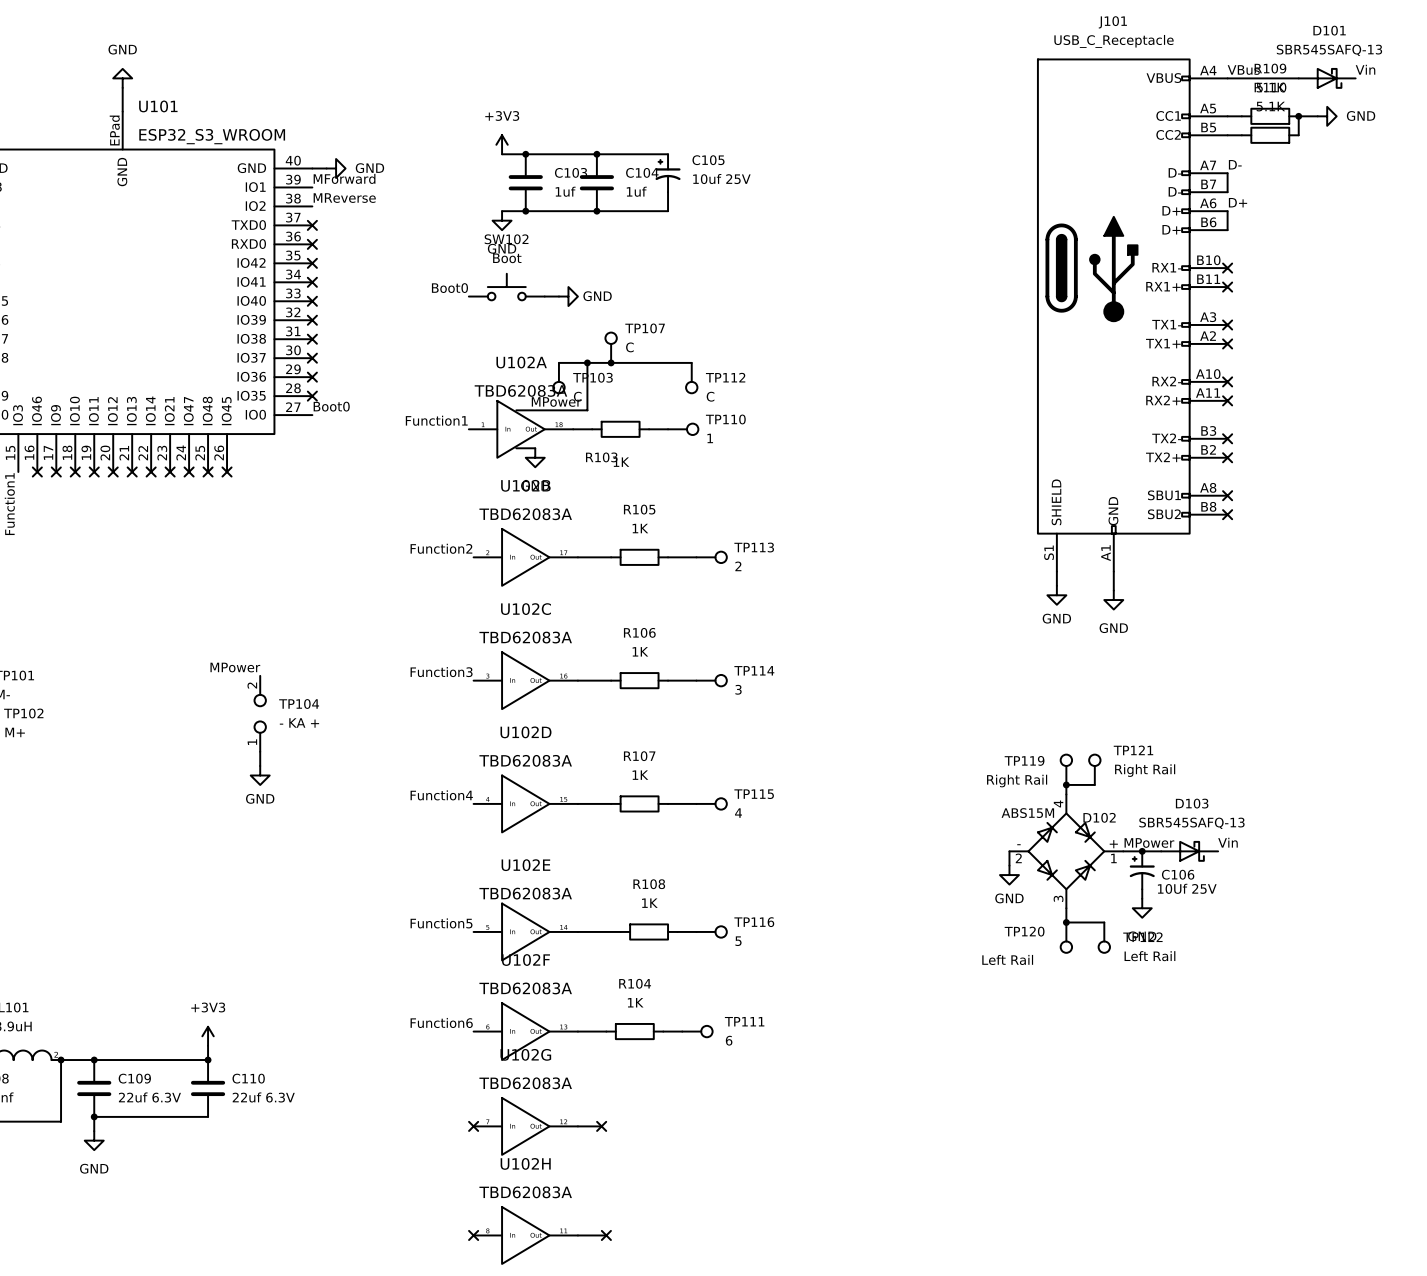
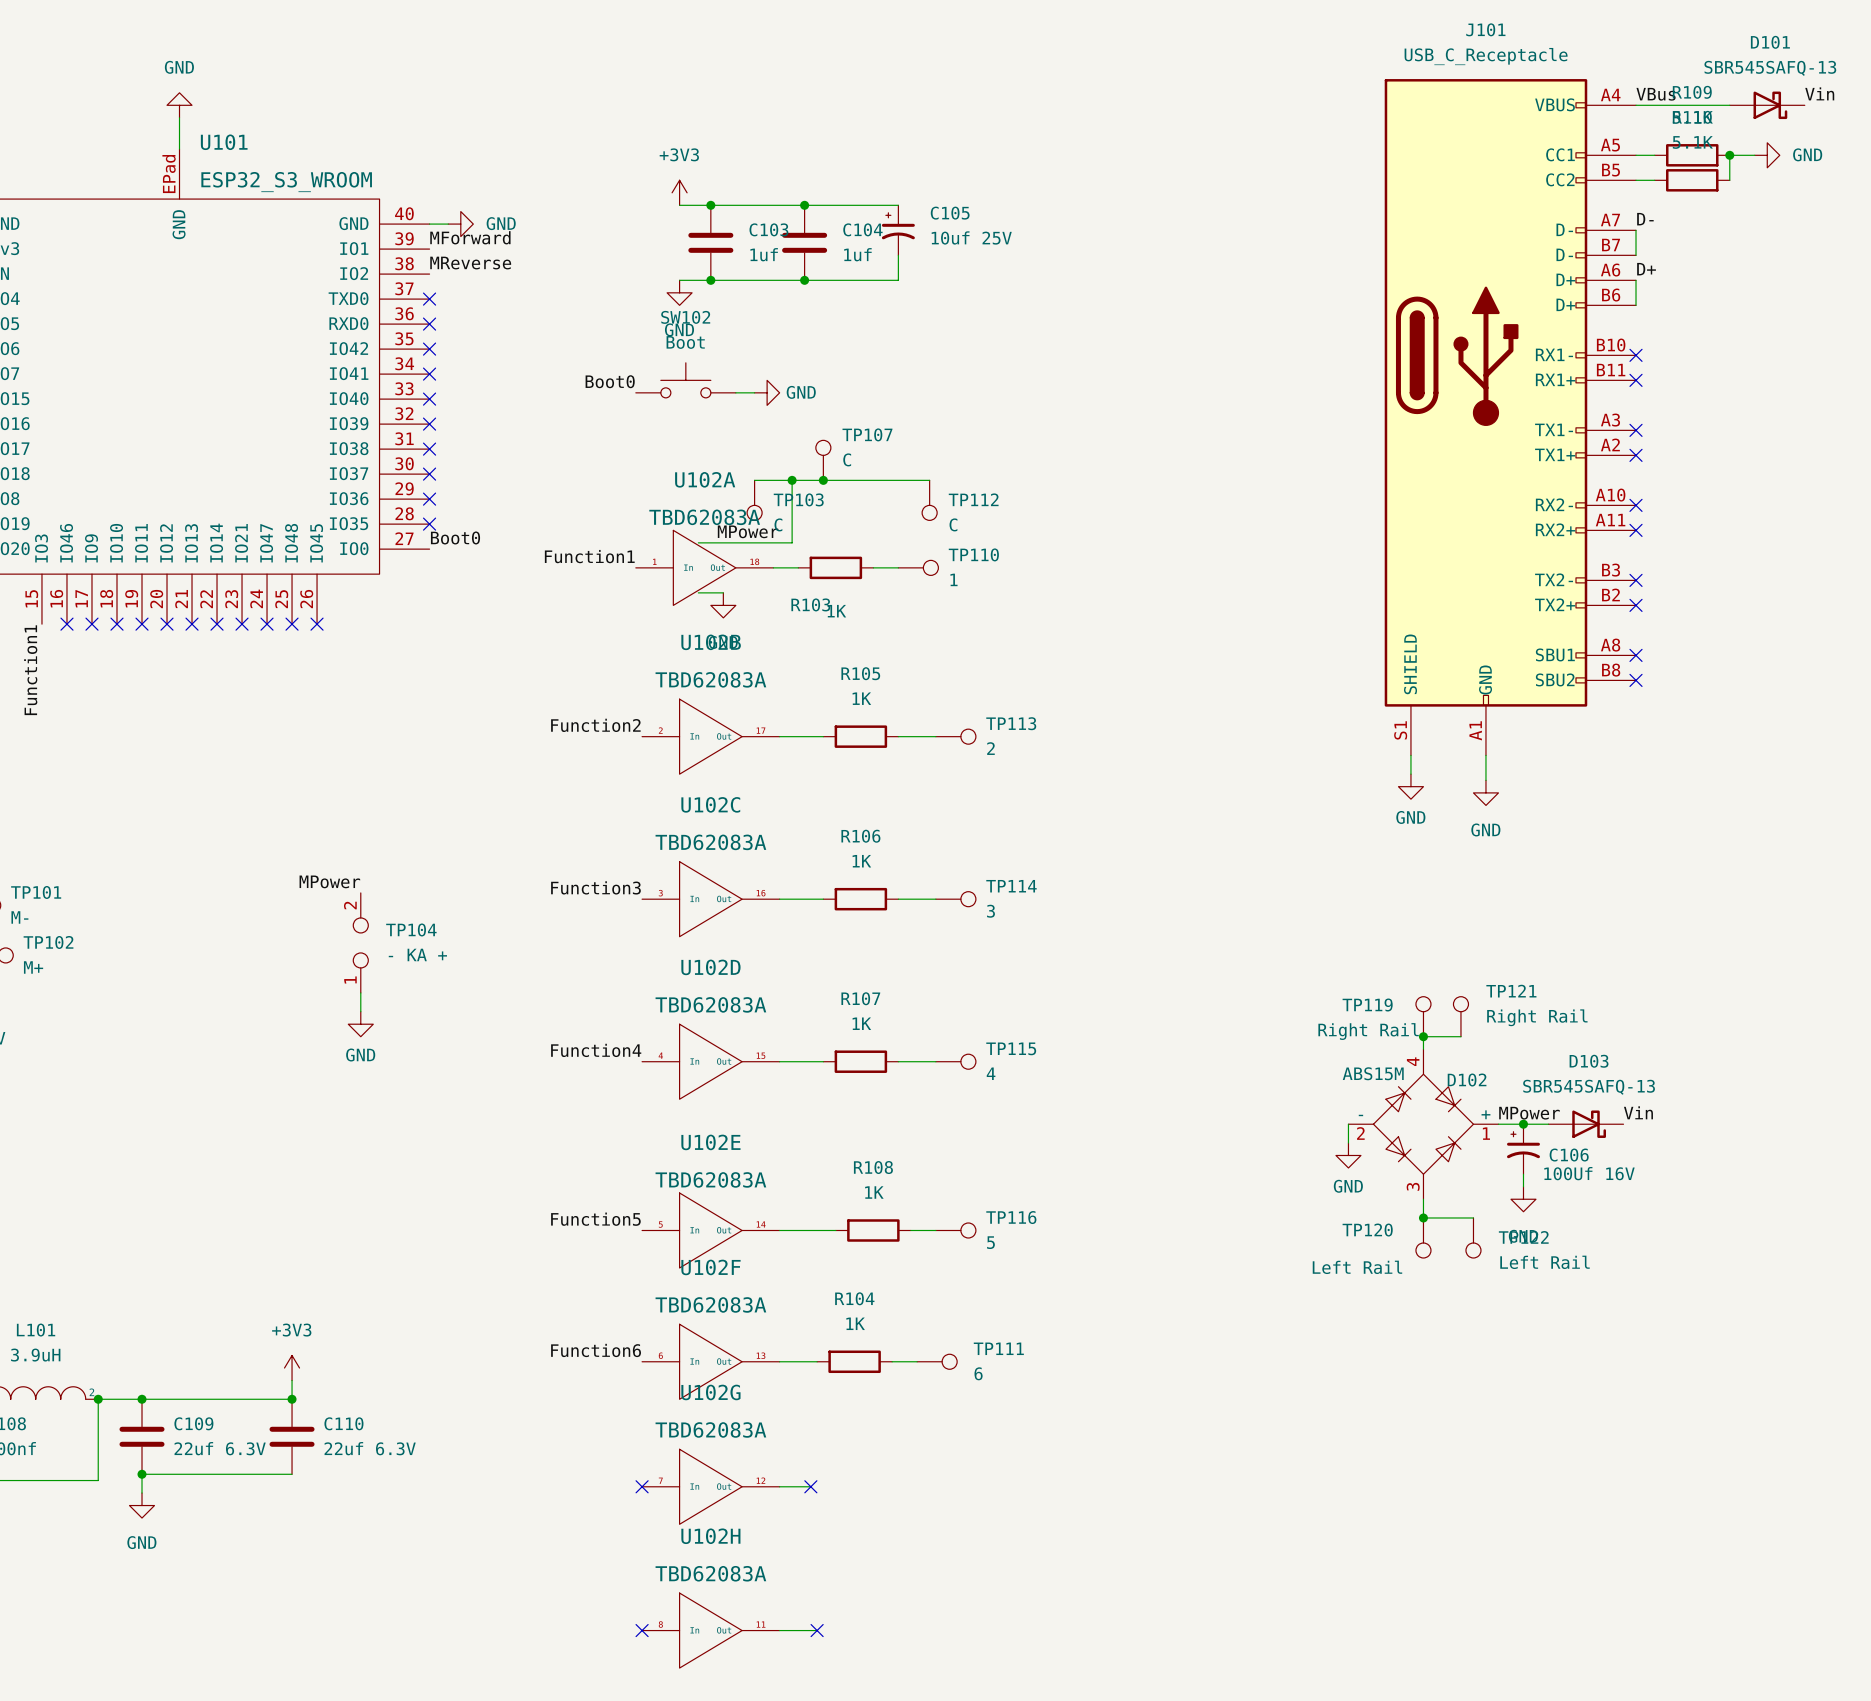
C106 value: 10Uf 25V (1187, 888) -> 100Uf 16V (1589, 1173)

